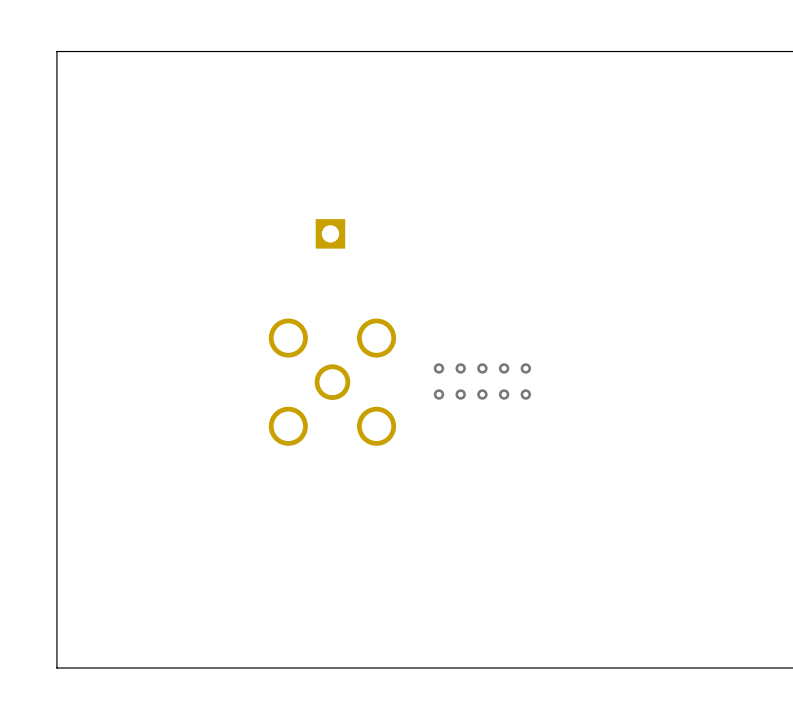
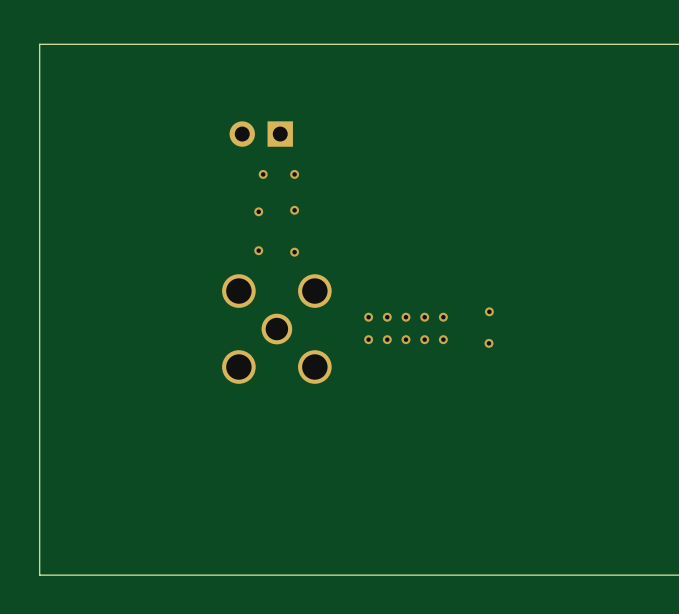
part: none -> (261, 134)
via: none -> (263, 174)
via: none -> (294, 174)
part: (330, 233) -> none
via: none -> (294, 210)
via: none -> (258, 211)
via: none -> (258, 250)
via: none -> (294, 252)
via: none -> (489, 311)
via: none -> (488, 343)

